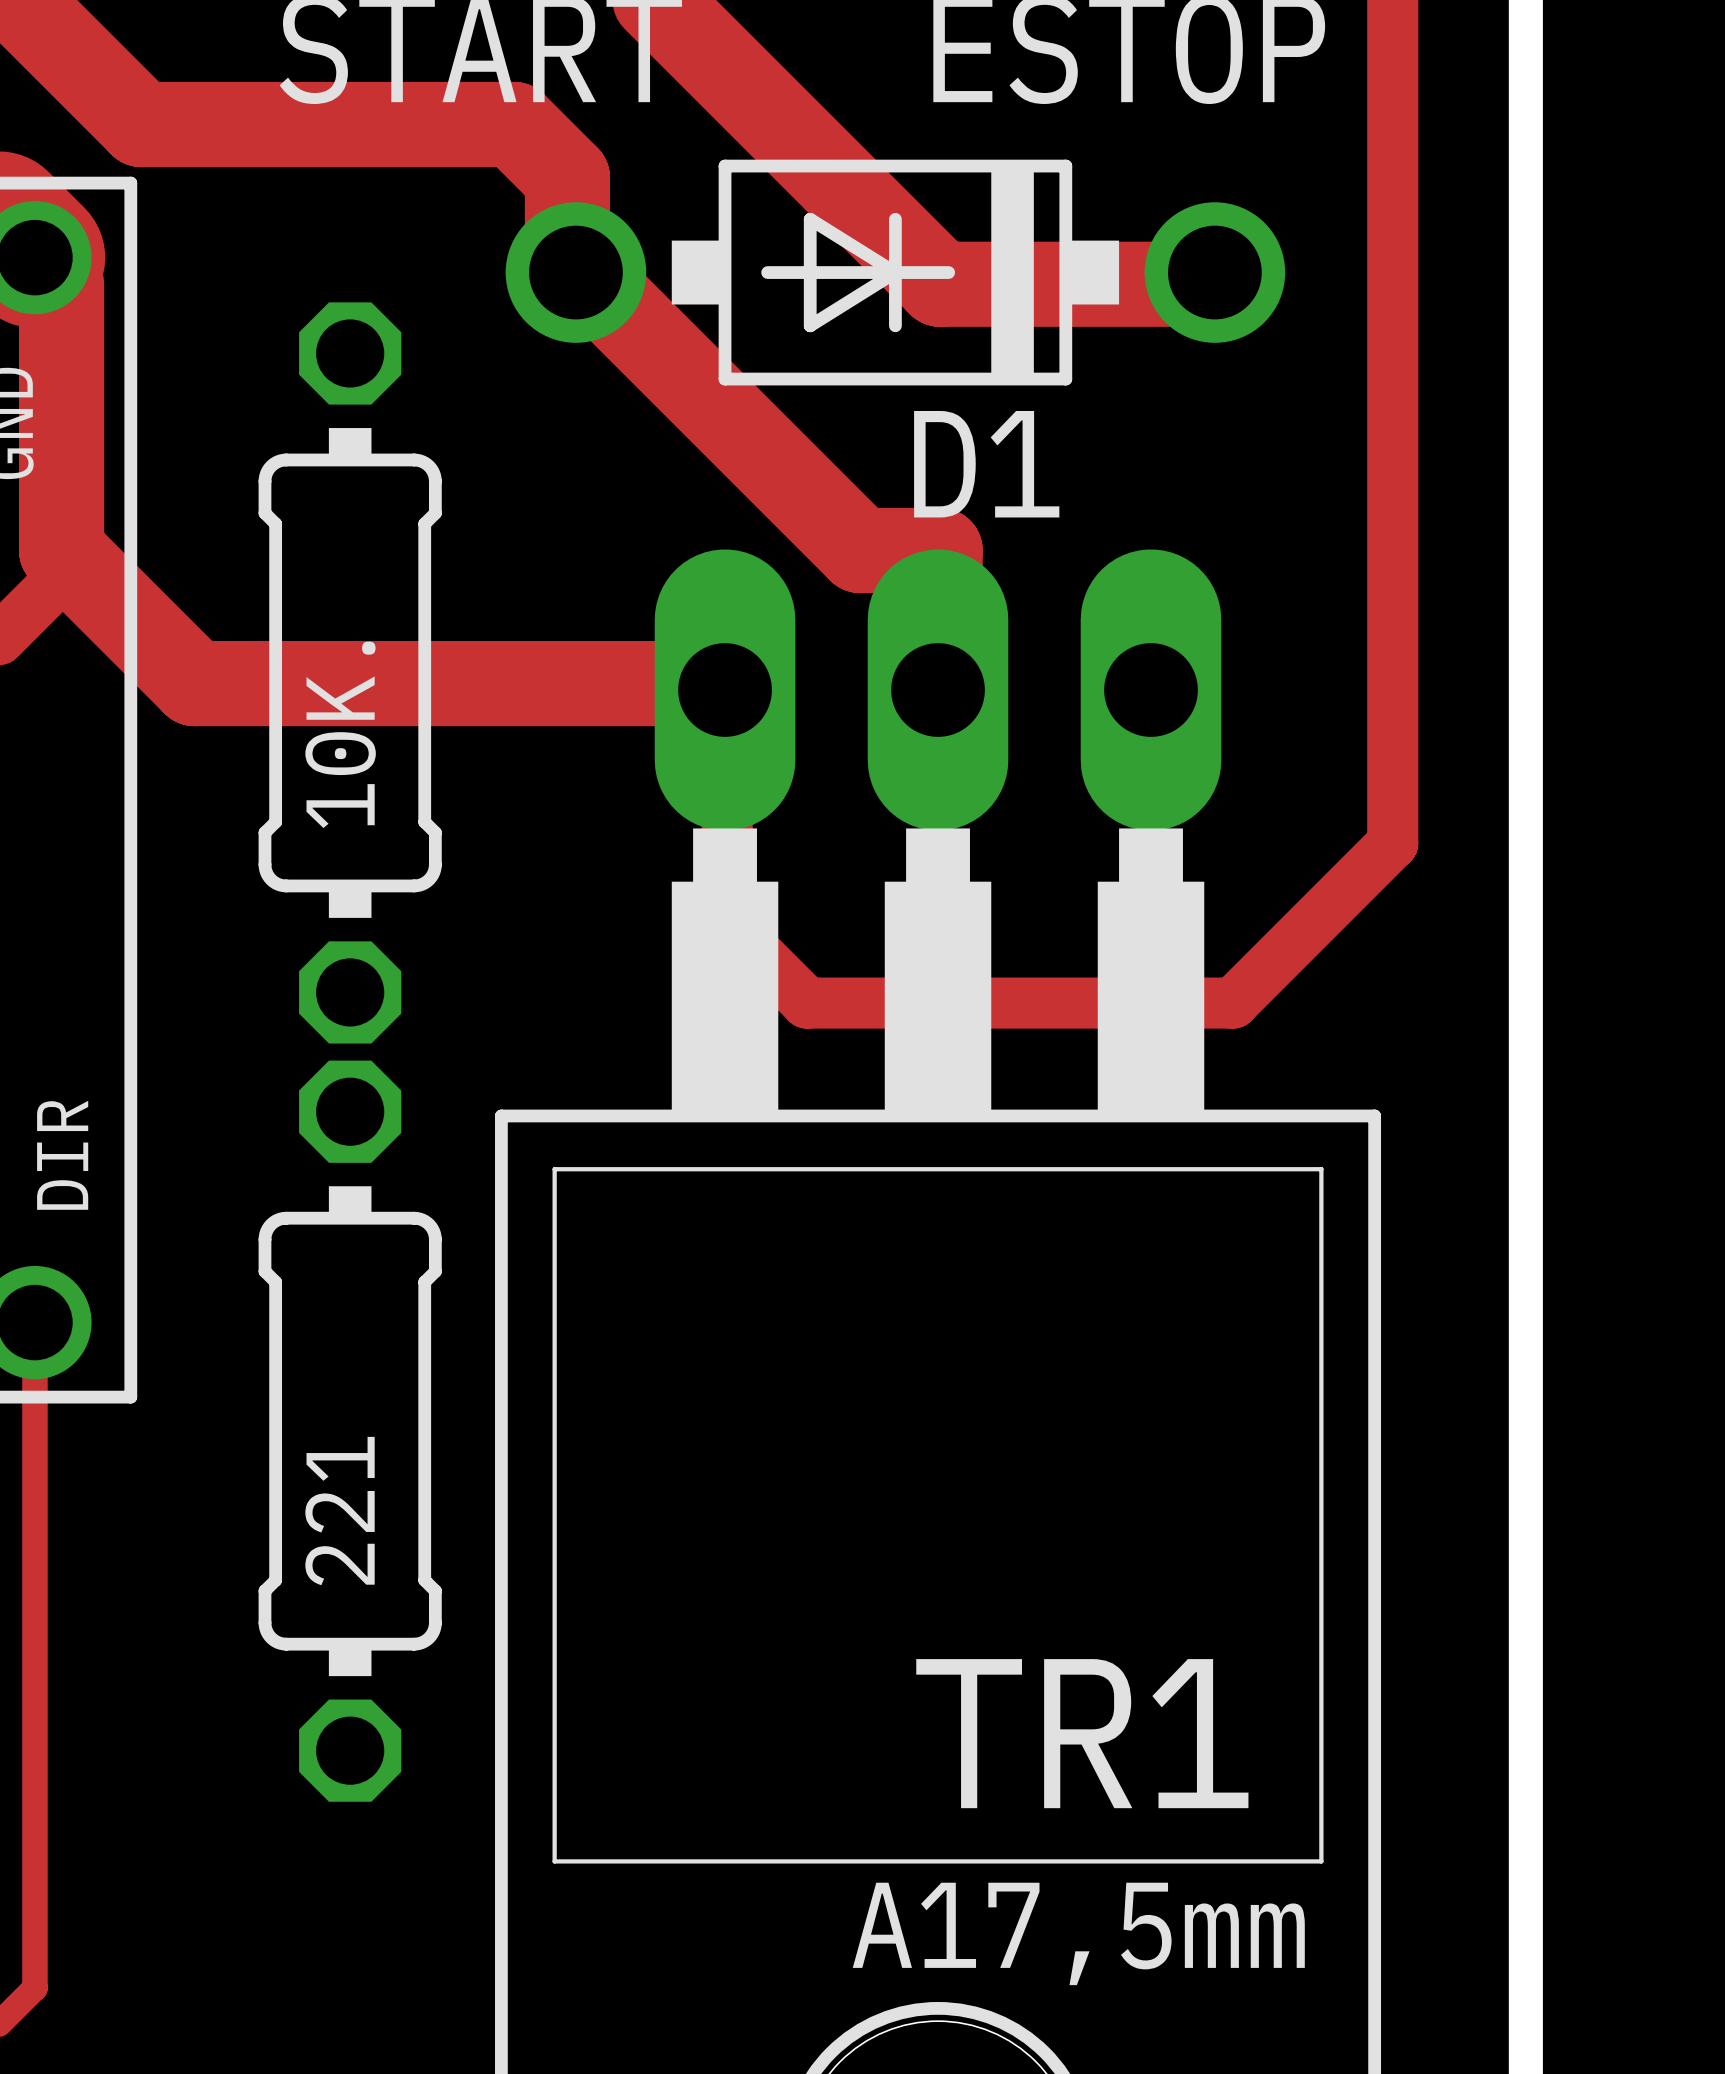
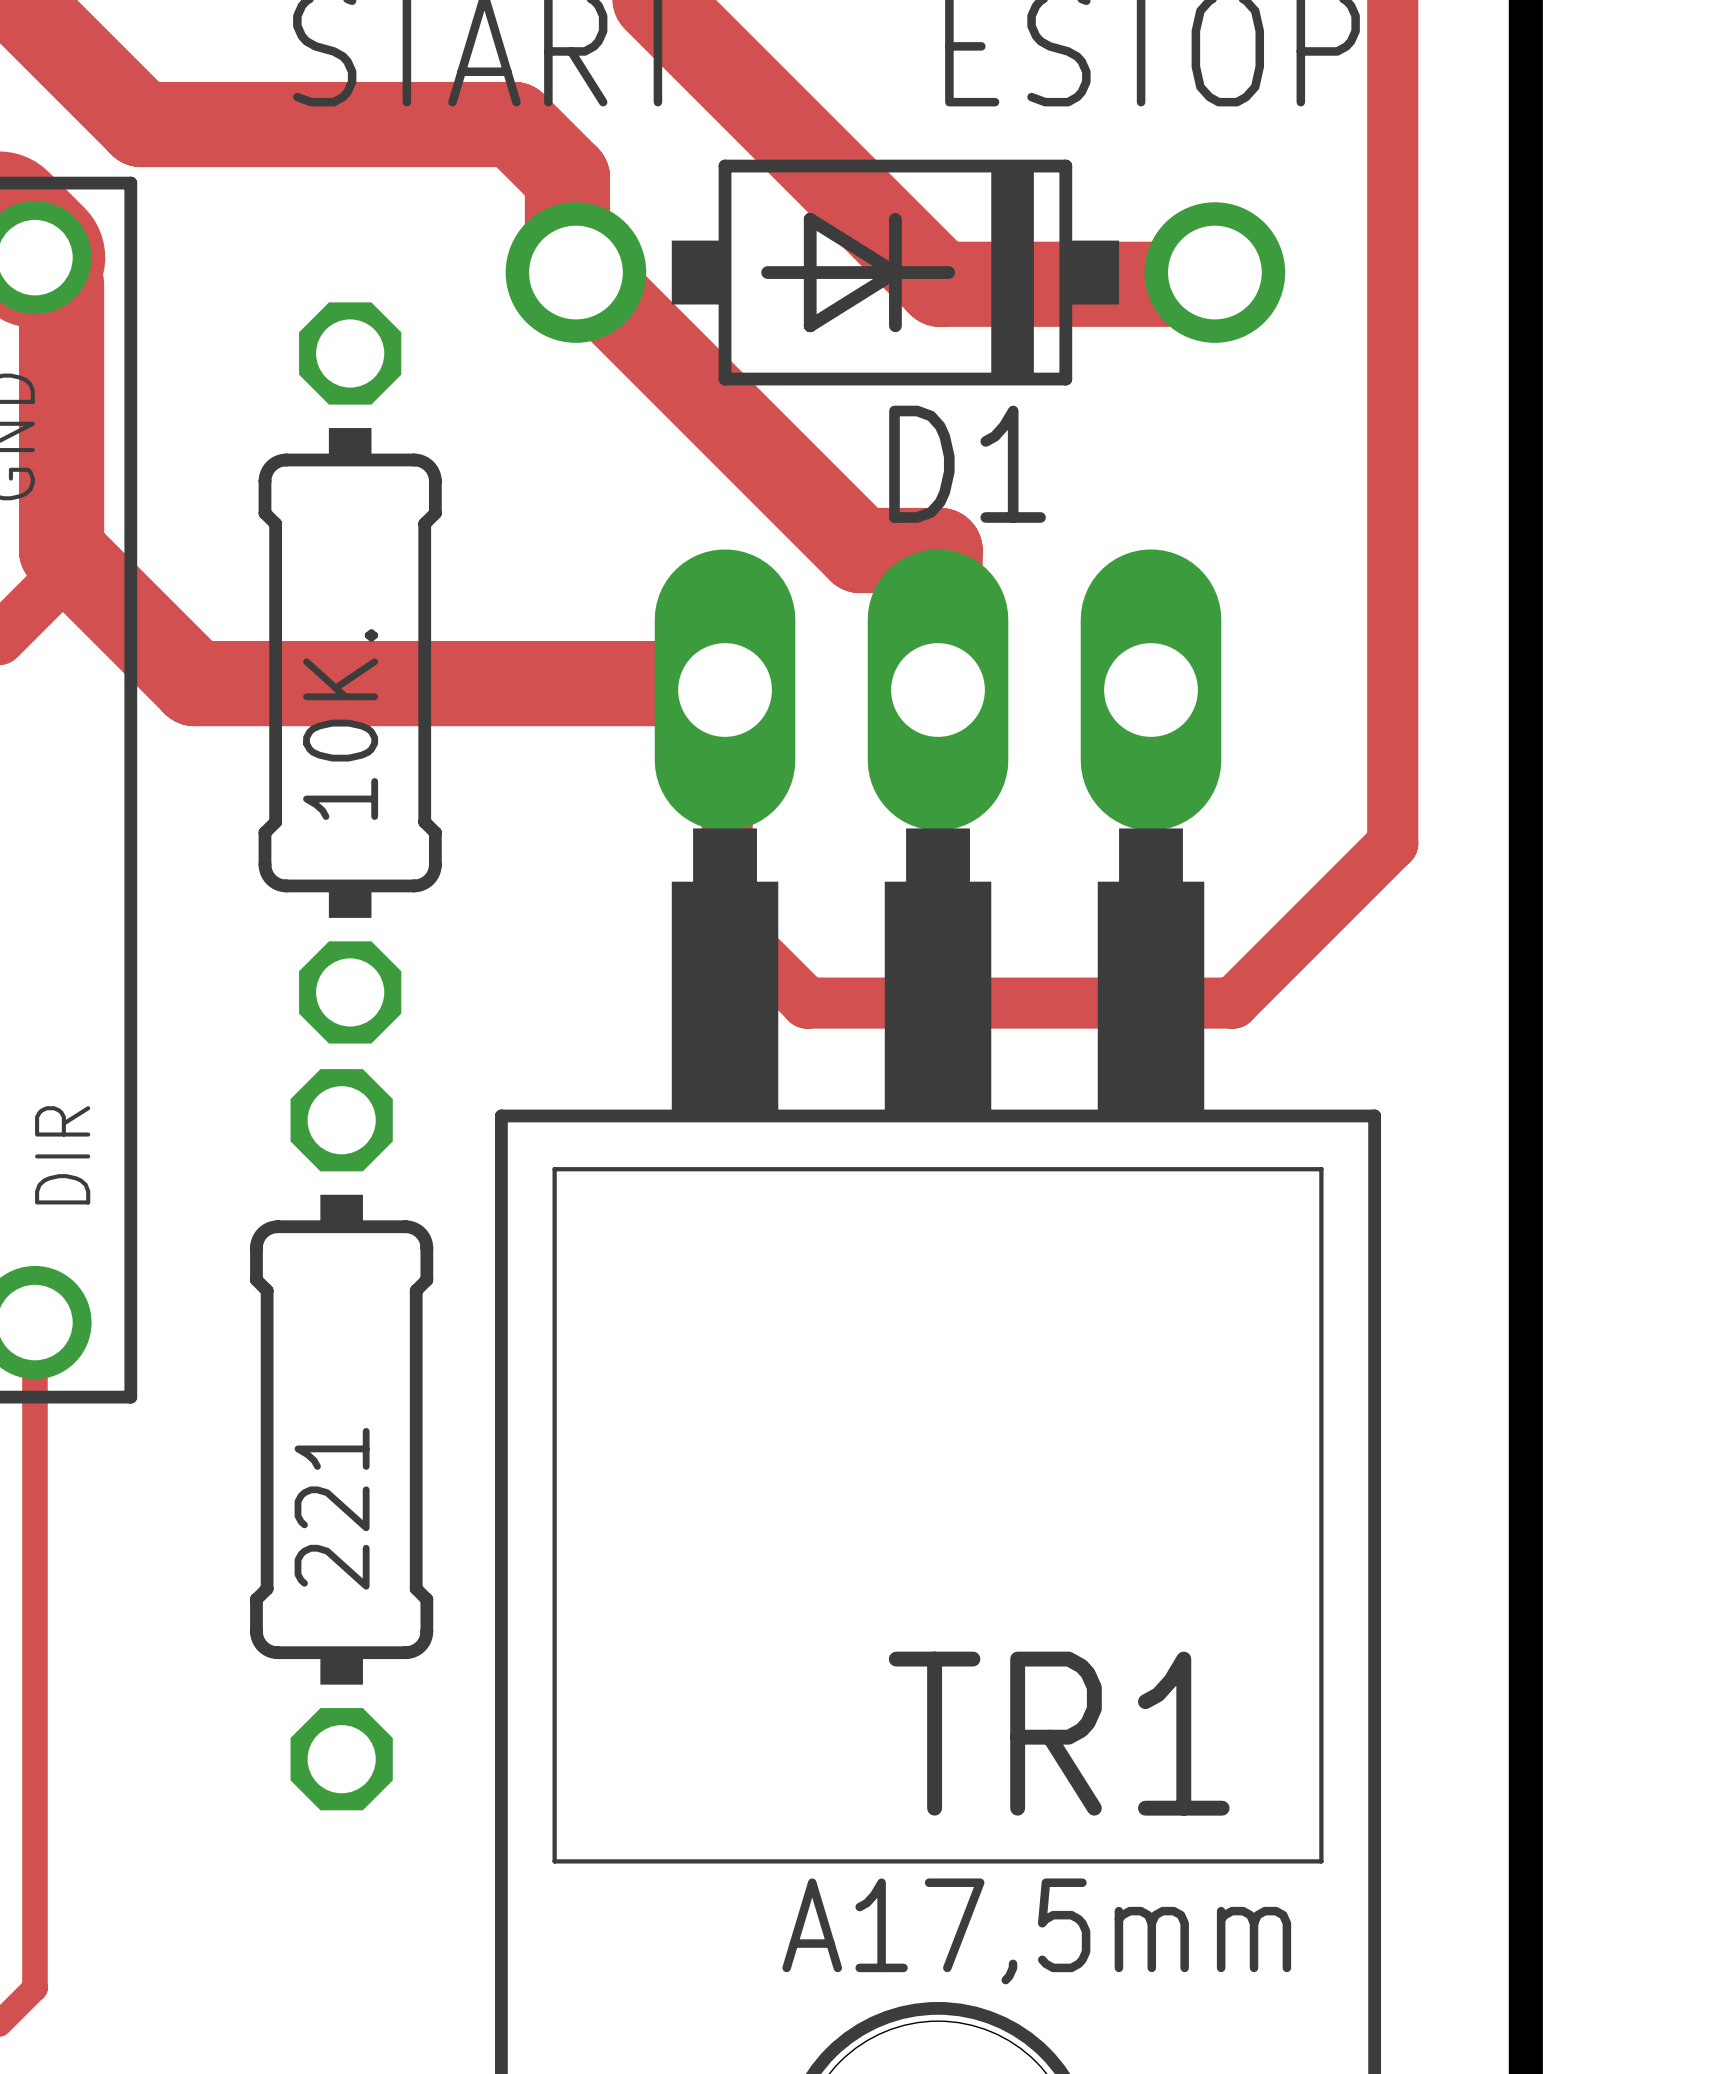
221 position: (350, 1431) -> (341, 1439)

